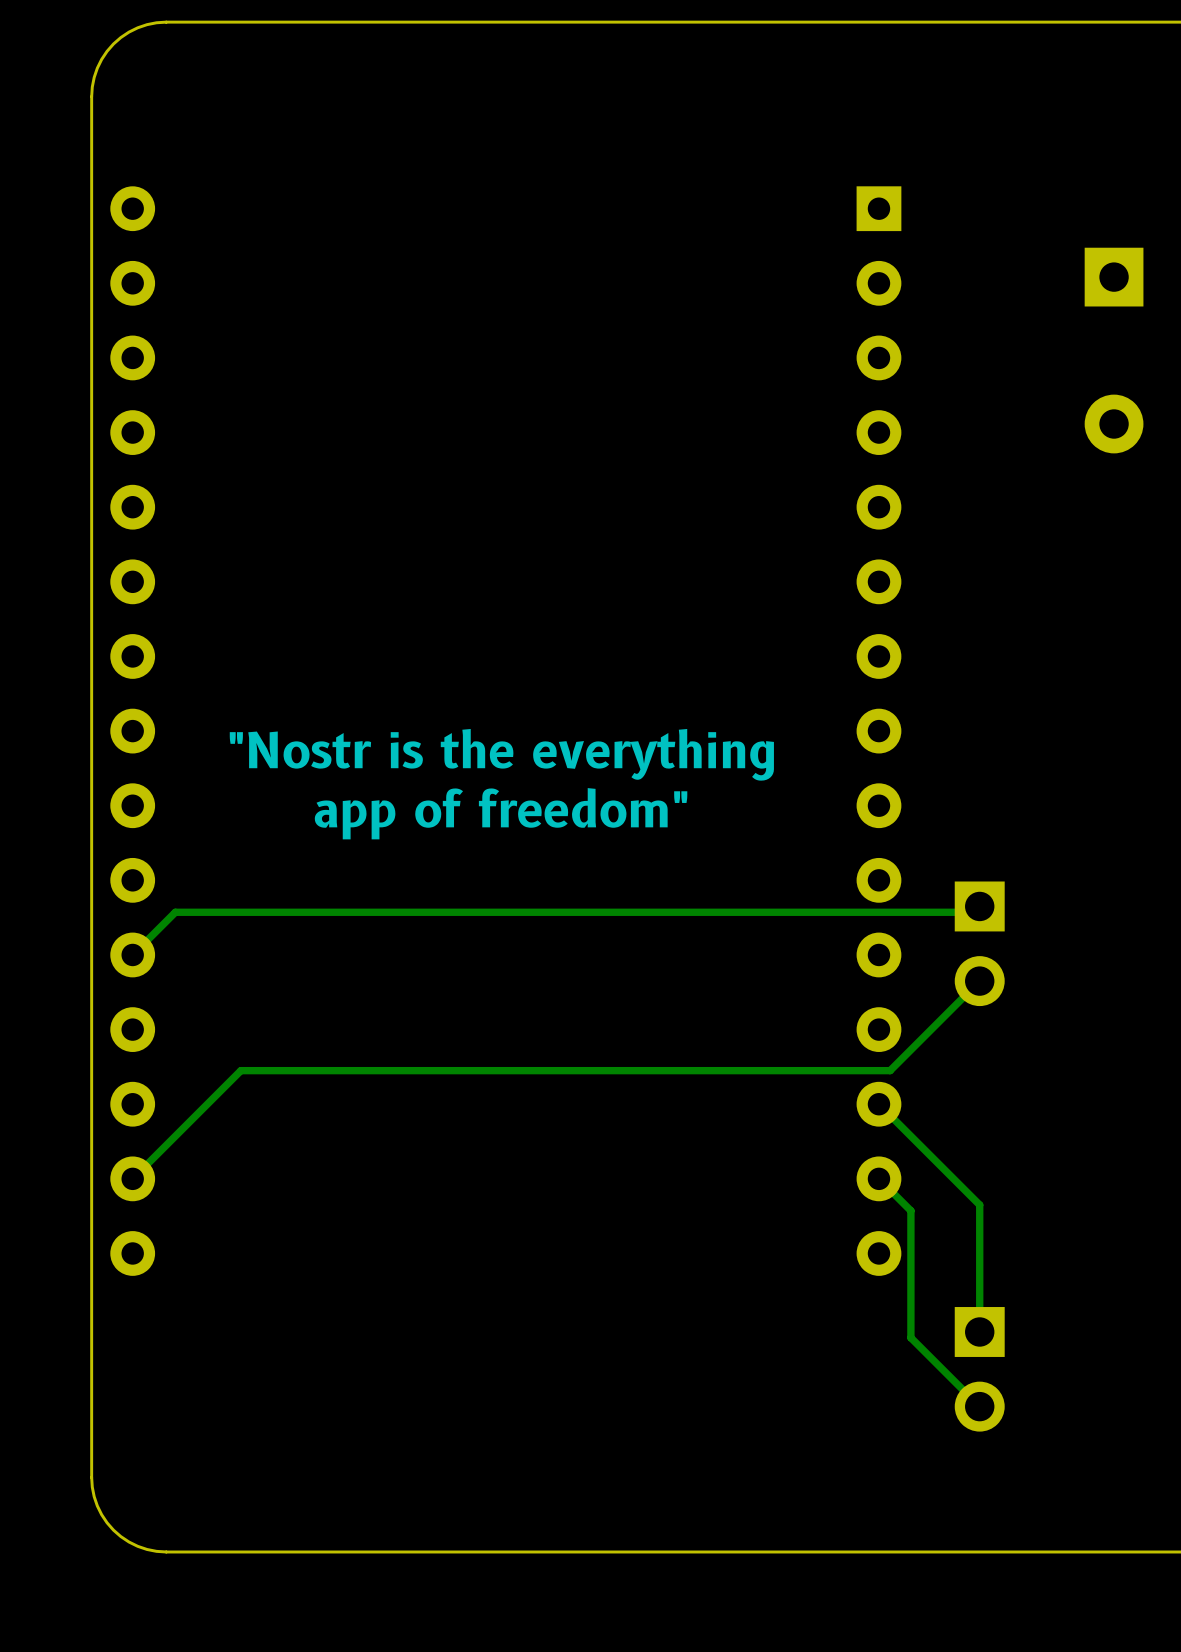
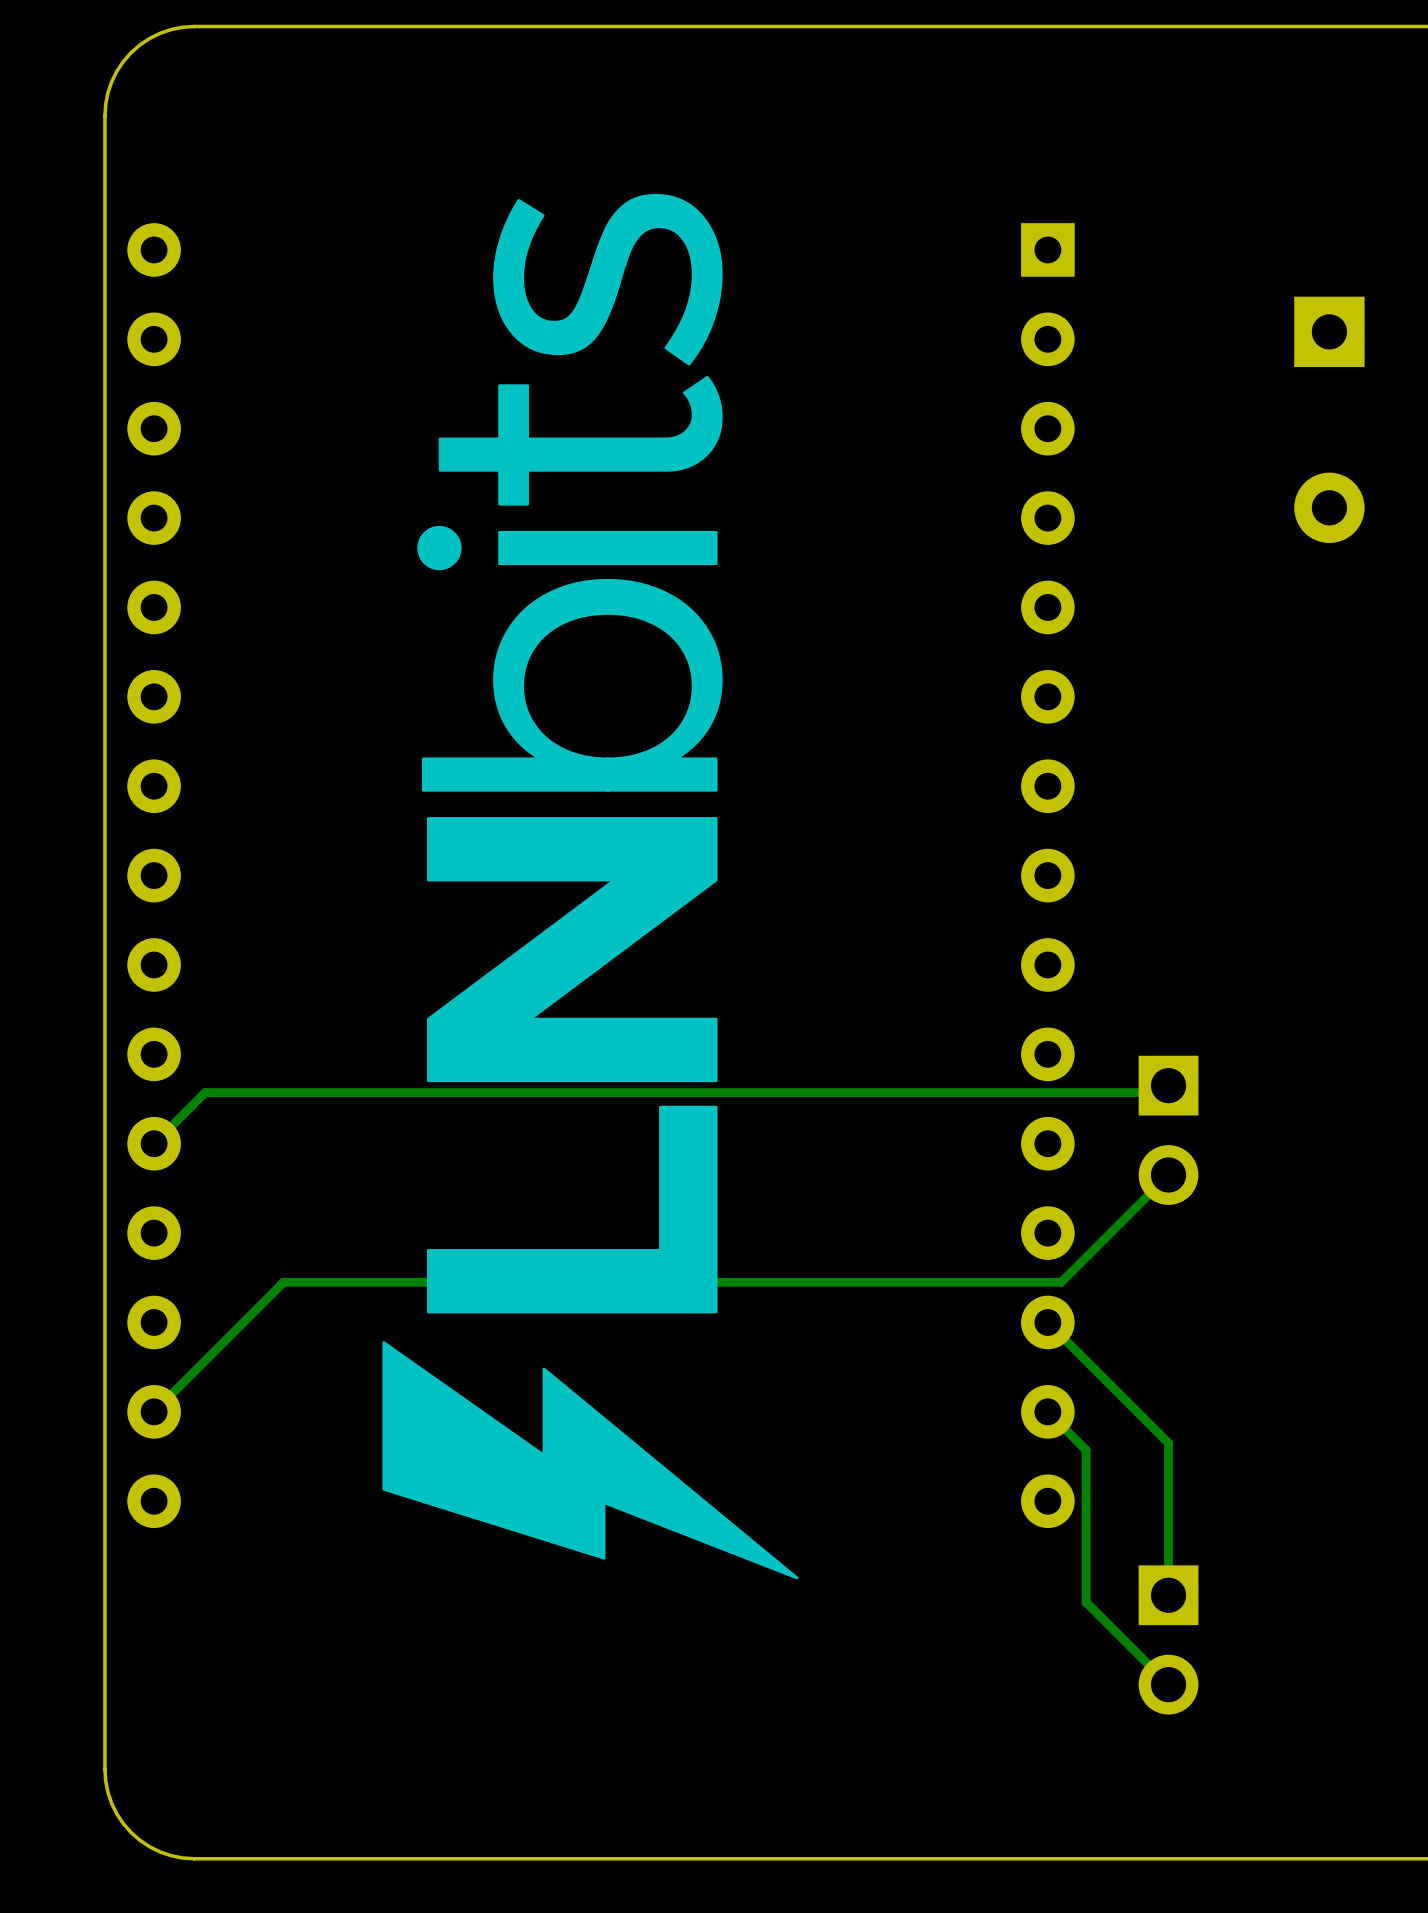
drawing: none -> [382, 193, 799, 1580]
text: "Nostr is the everything (501, 754) -> none
text: app of freedom" (501, 813) -> none

